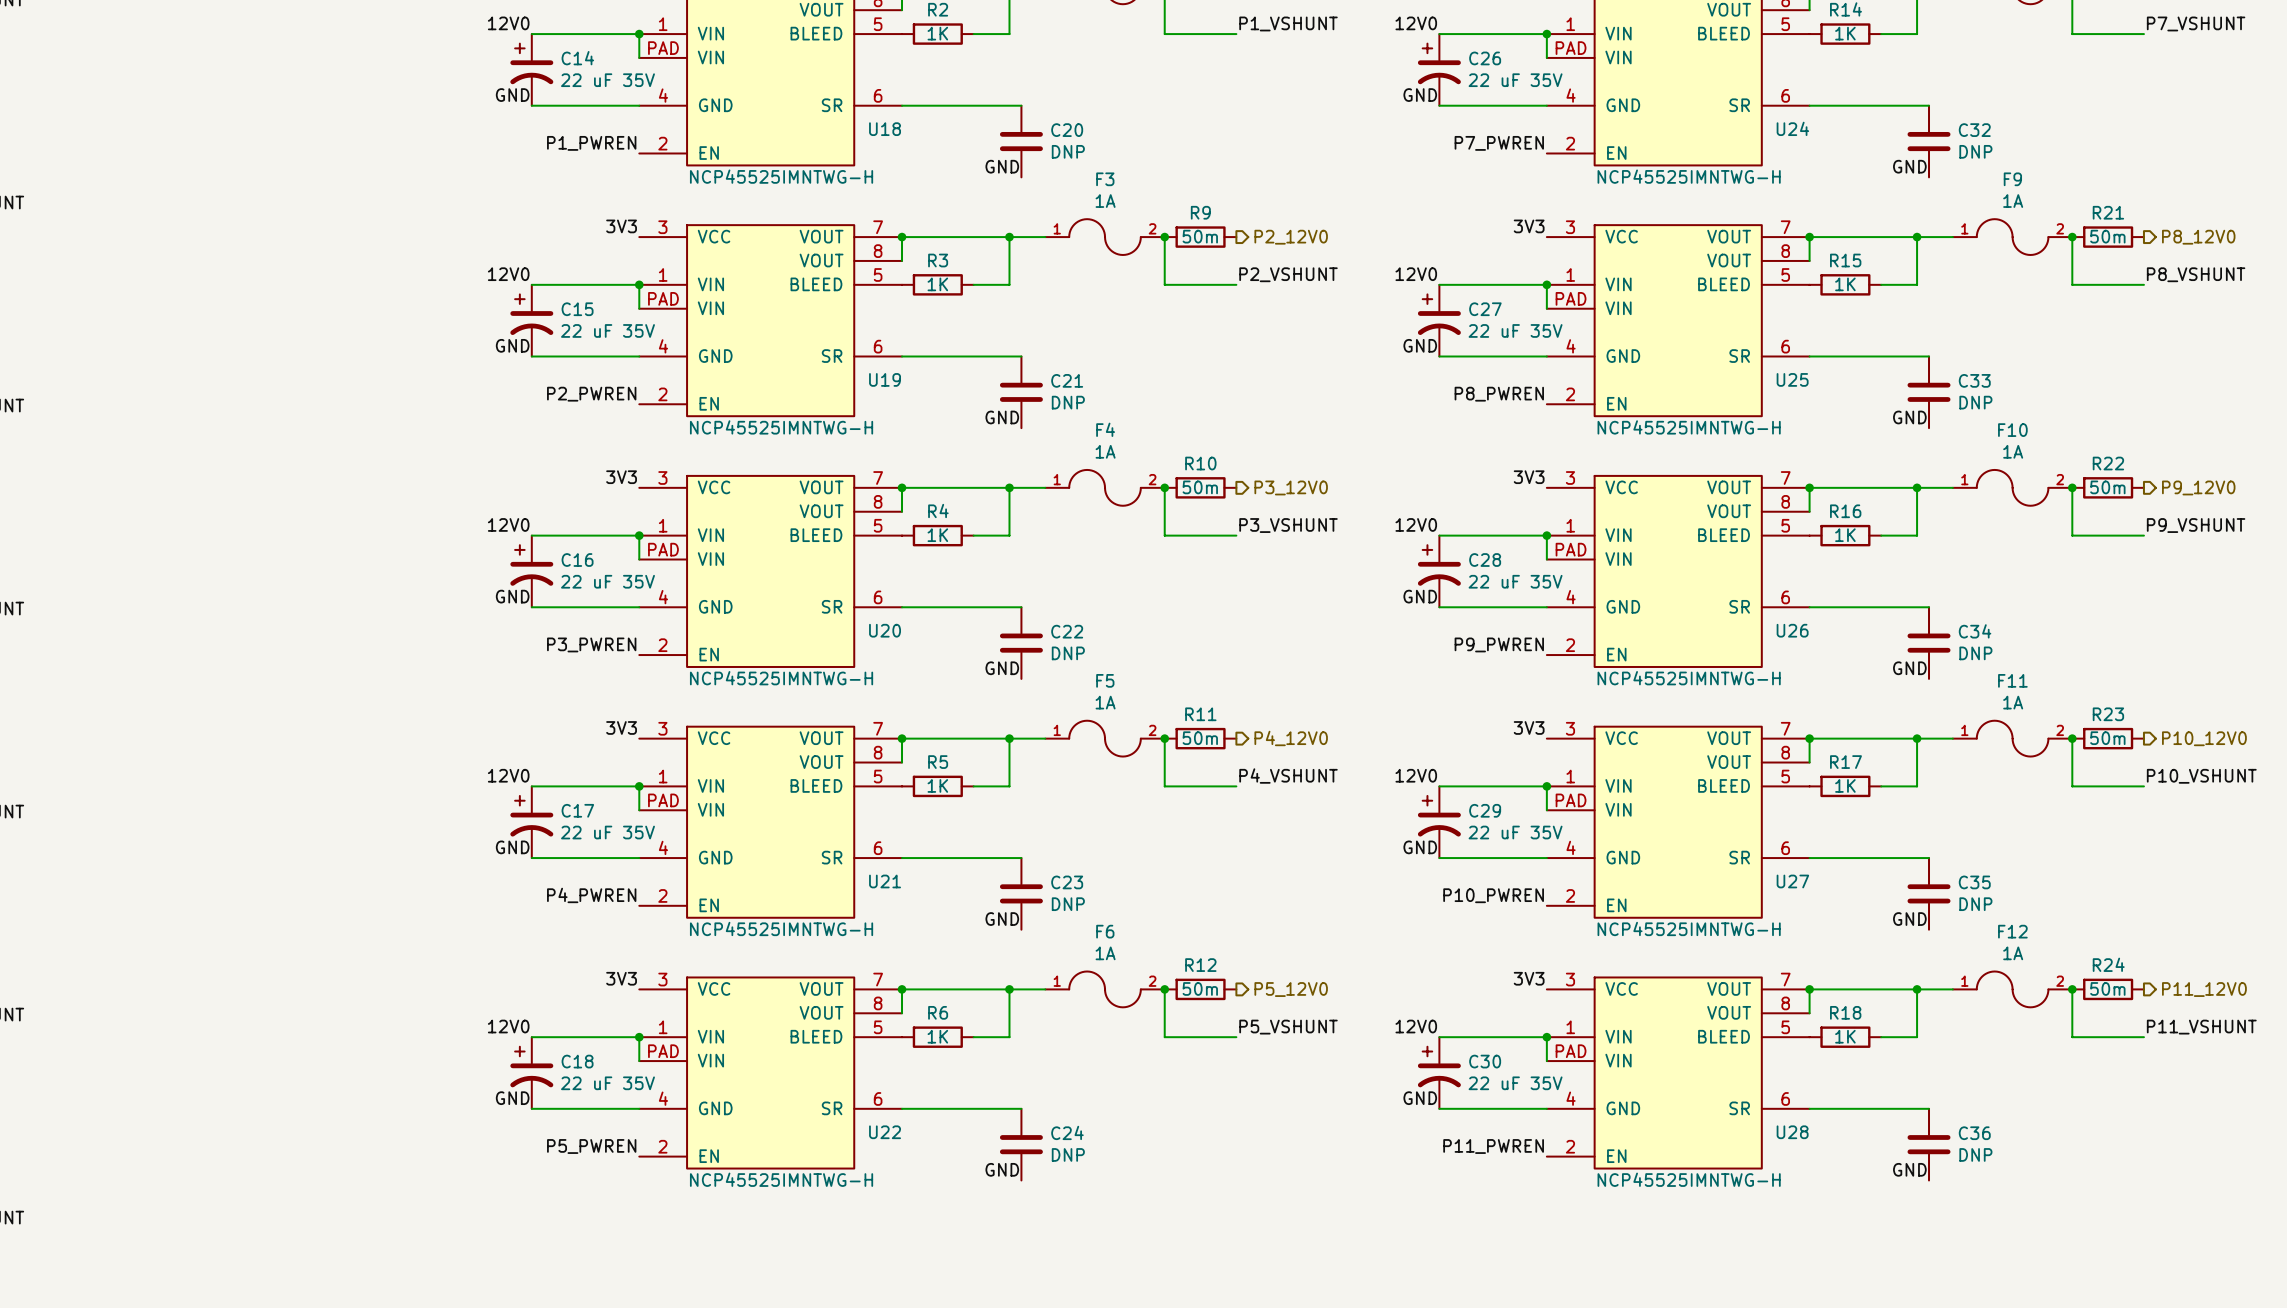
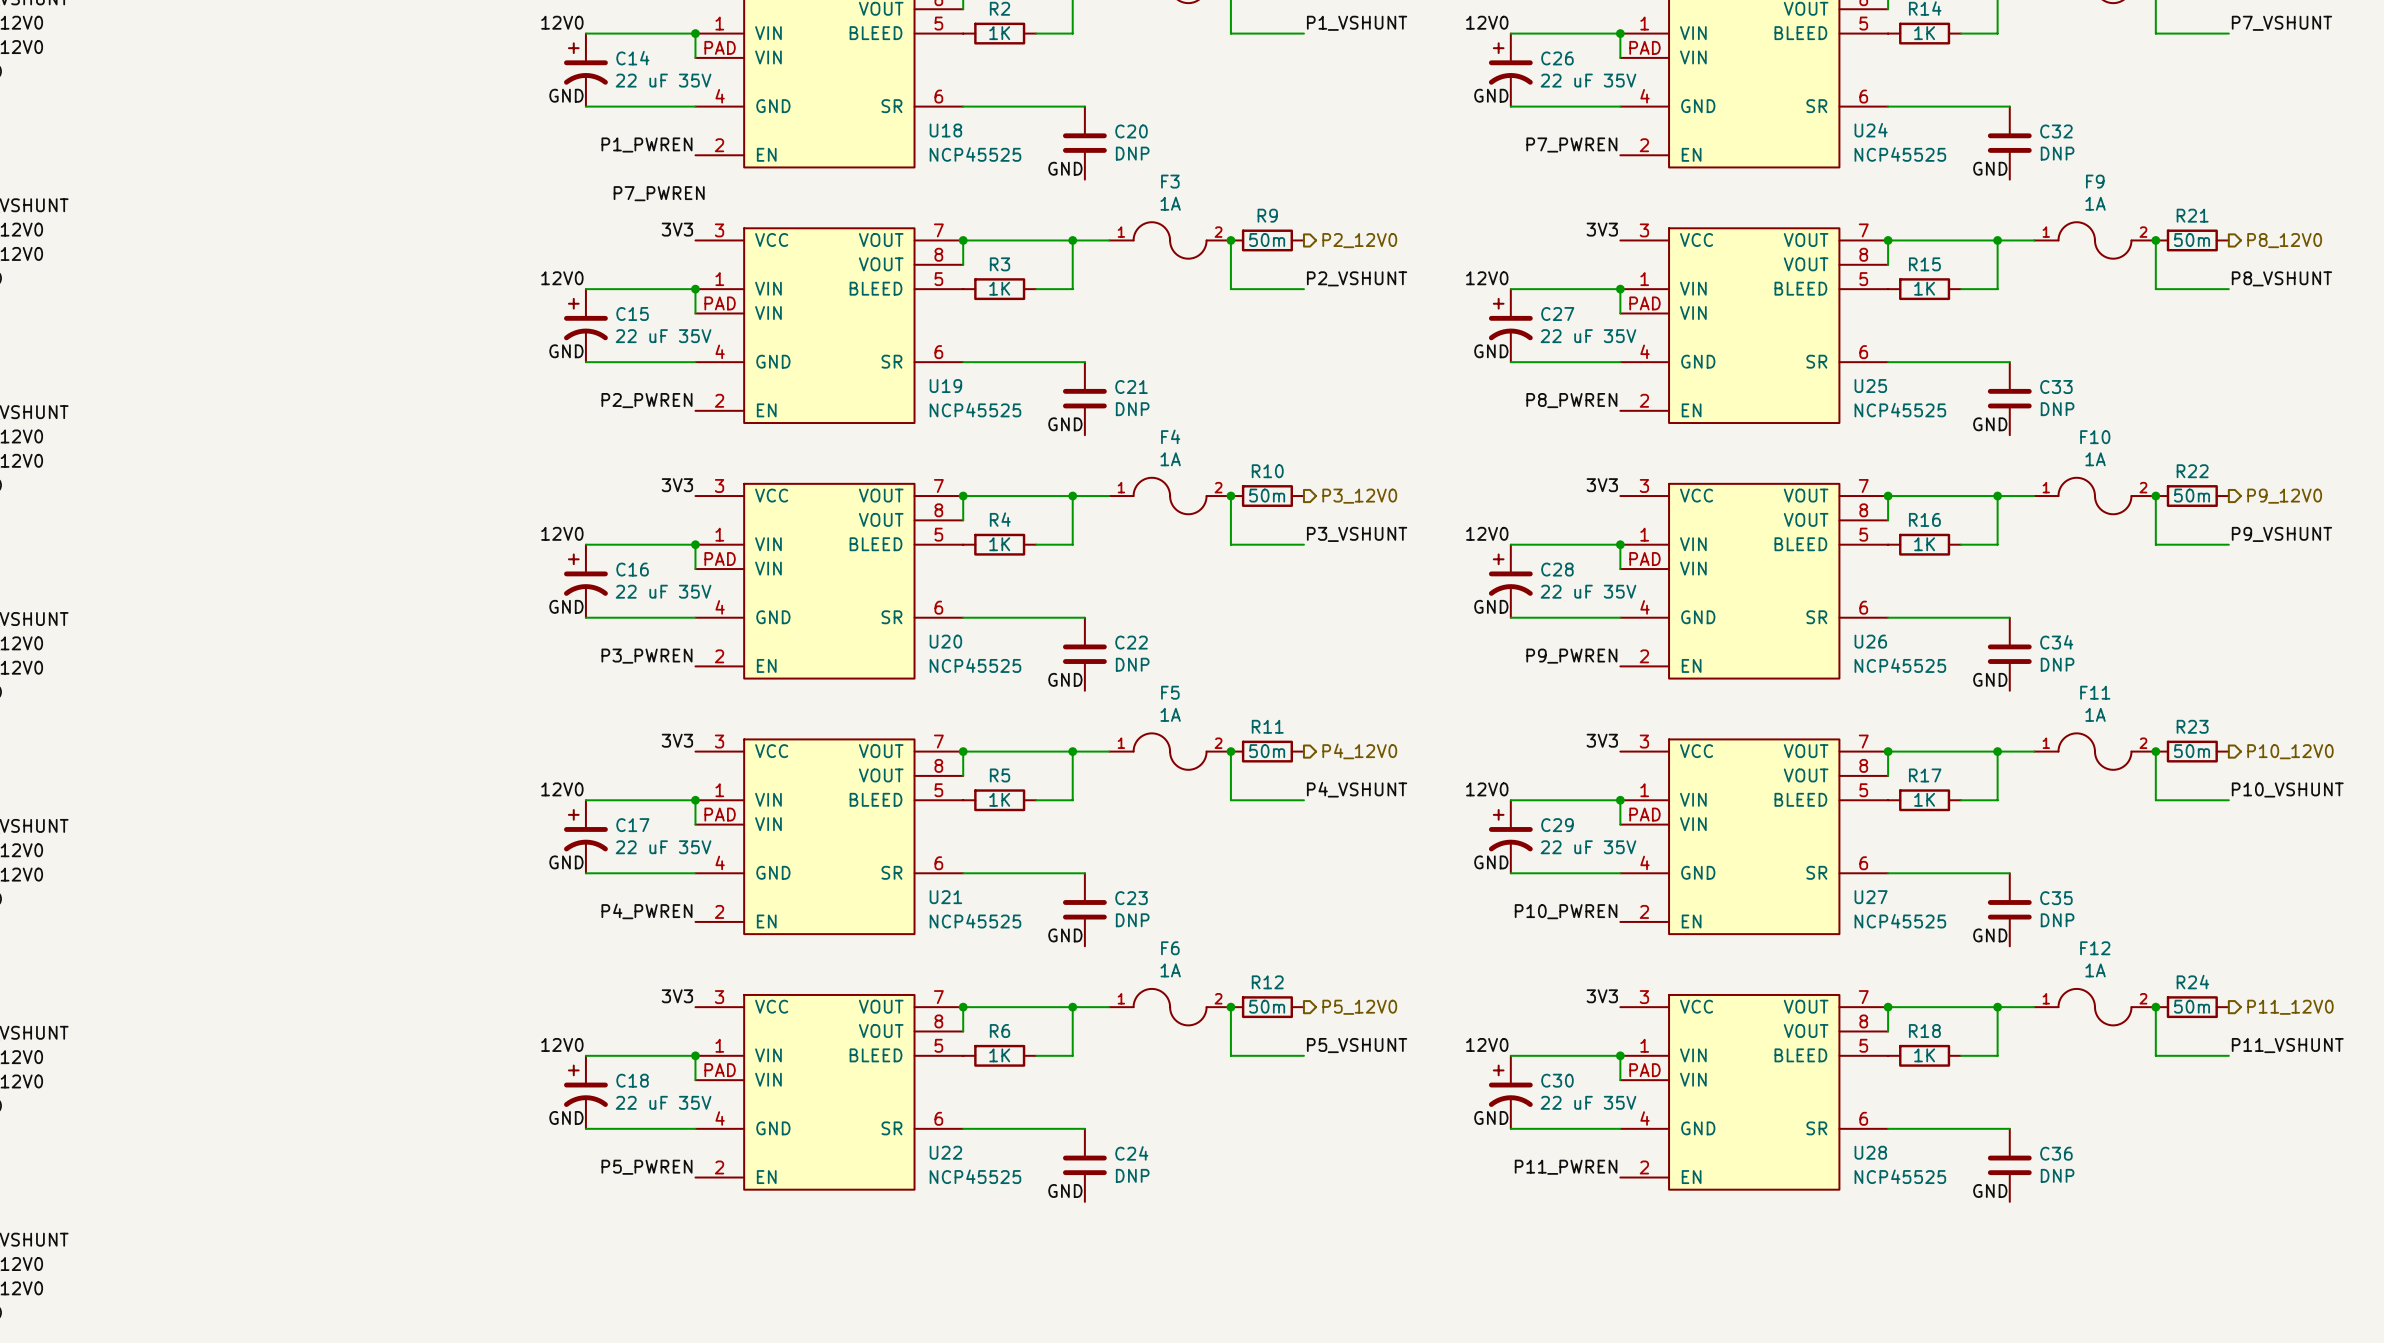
U18 value: NCP45525IMNTWG-H (781, 176) -> NCP45525 (975, 154)
U24 value: NCP45525IMNTWG-H (1689, 176) -> NCP45525 (1900, 154)
label: none -> P7_PWREN (659, 193)
U19 value: NCP45525IMNTWG-H (781, 427) -> NCP45525 (975, 410)
U25 value: NCP45525IMNTWG-H (1689, 427) -> NCP45525 (1900, 410)
U20 value: NCP45525IMNTWG-H (781, 678) -> NCP45525 (975, 665)
U26 value: NCP45525IMNTWG-H (1689, 678) -> NCP45525 (1900, 665)
U21 value: NCP45525IMNTWG-H (781, 928) -> NCP45525 (975, 921)
U27 value: NCP45525IMNTWG-H (1689, 928) -> NCP45525 (1900, 921)
U22 value: NCP45525IMNTWG-H (781, 1179) -> NCP45525 (975, 1176)
U28 value: NCP45525IMNTWG-H (1689, 1179) -> NCP45525 (1900, 1176)

